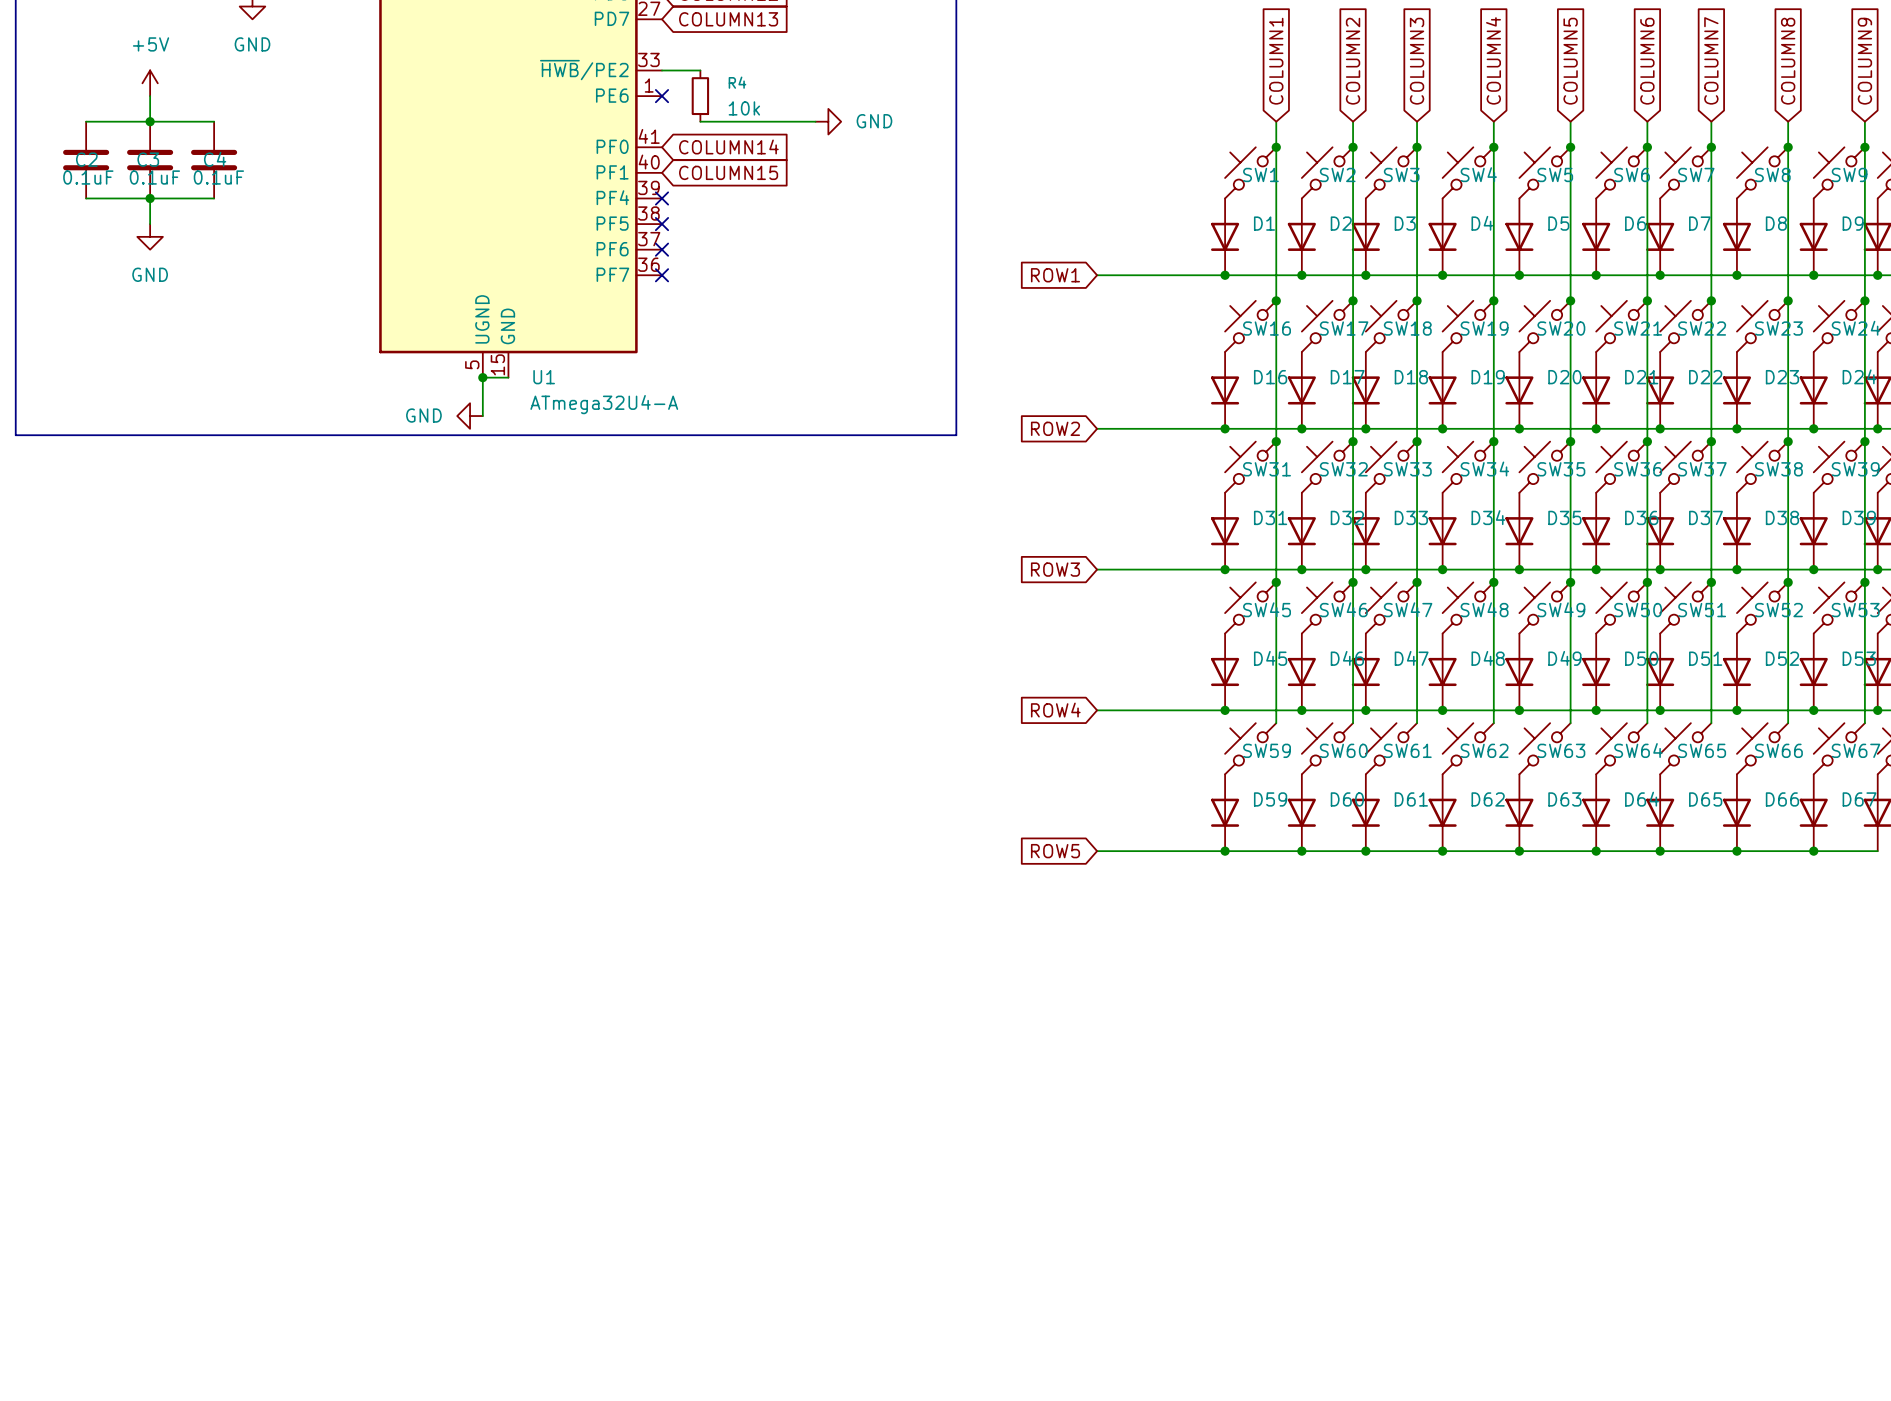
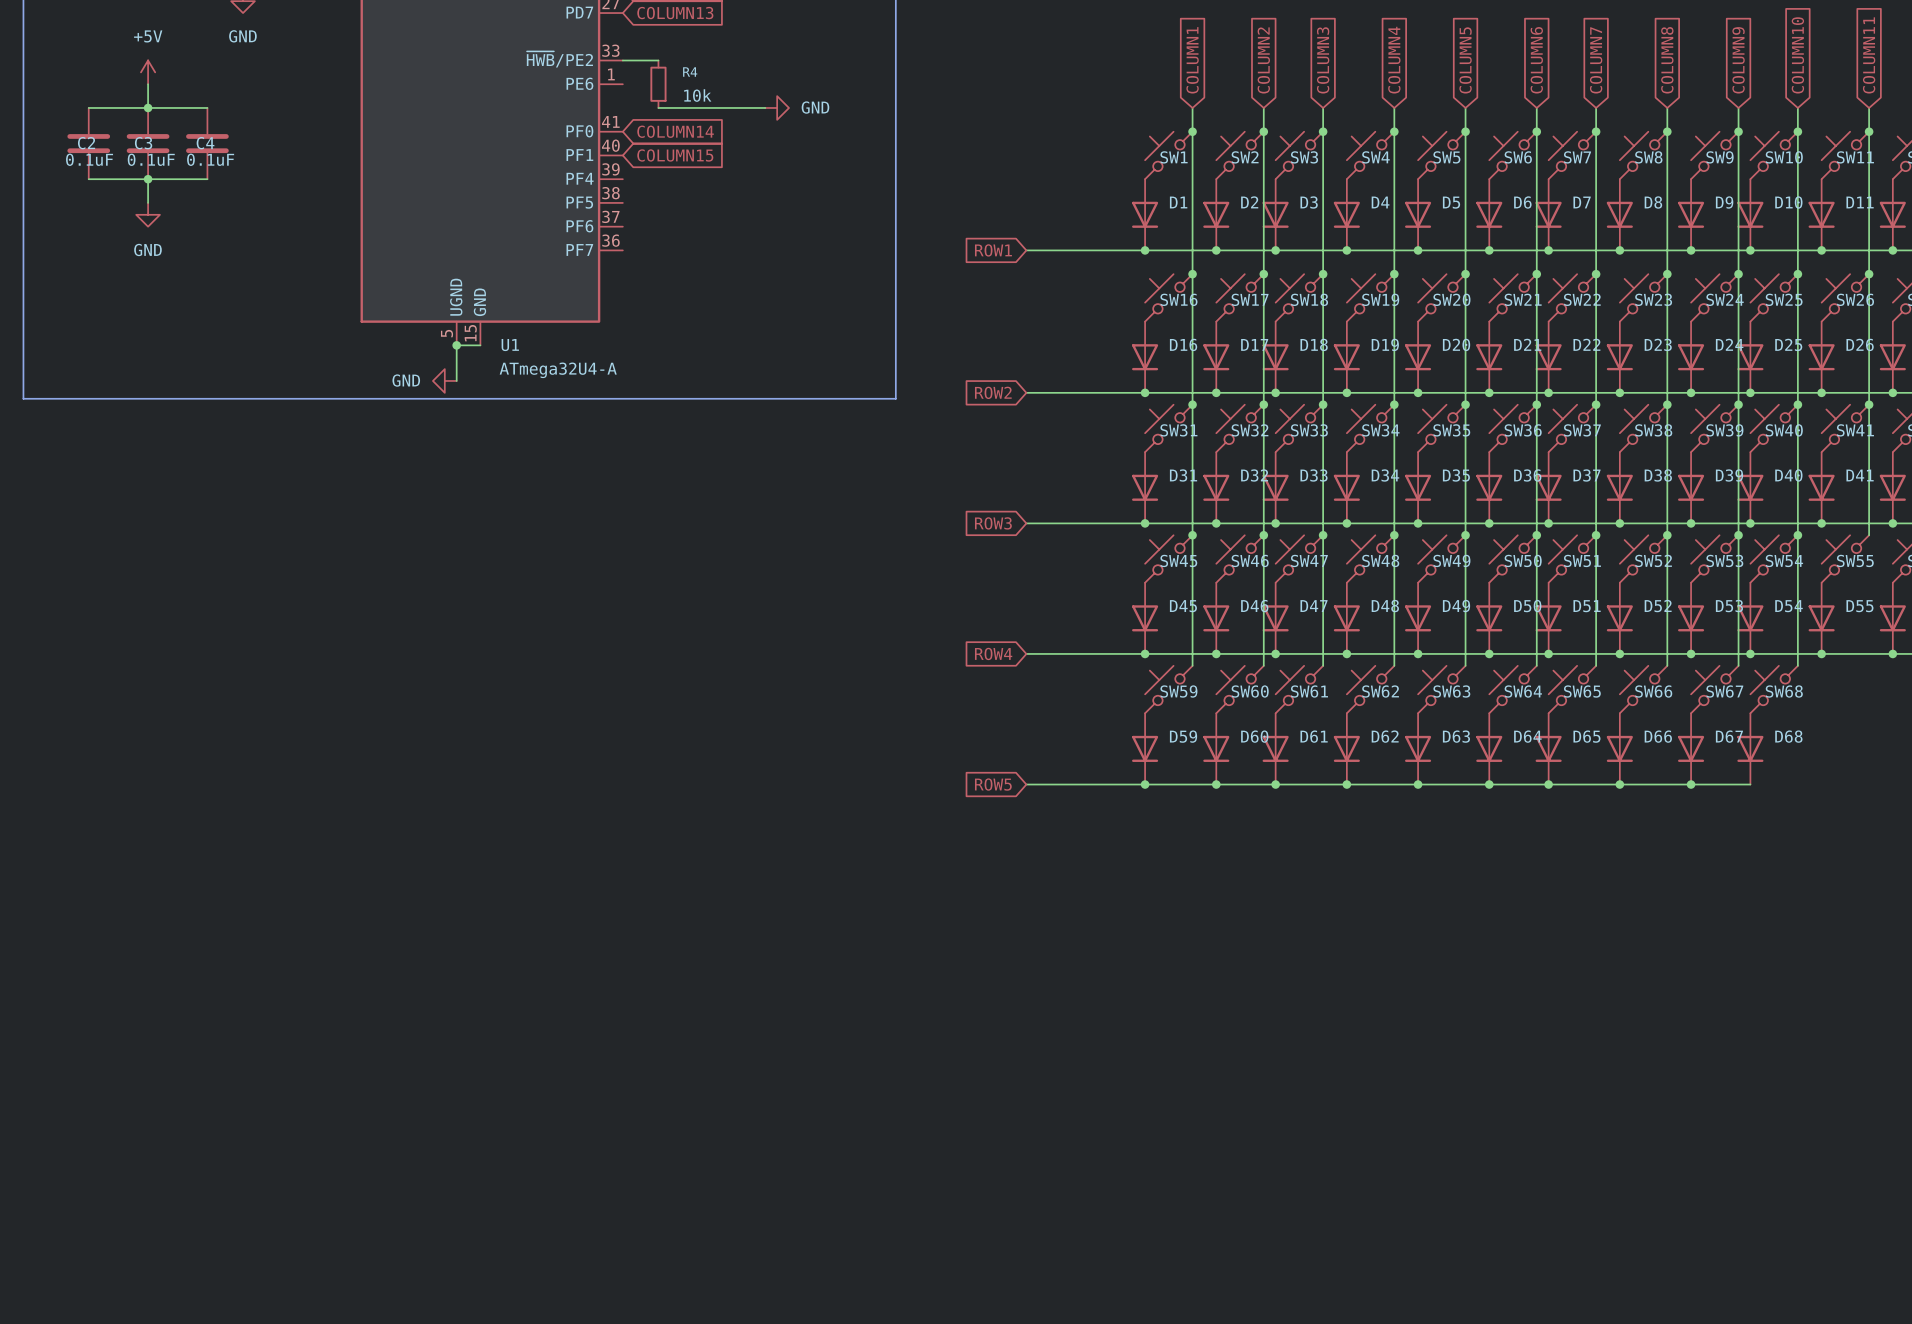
no-connect mark: (662, 96) -> none
no-connect mark: (662, 198) -> none
no-connect mark: (662, 224) -> none
no-connect mark: (662, 249) -> none
no-connect mark: (662, 275) -> none

